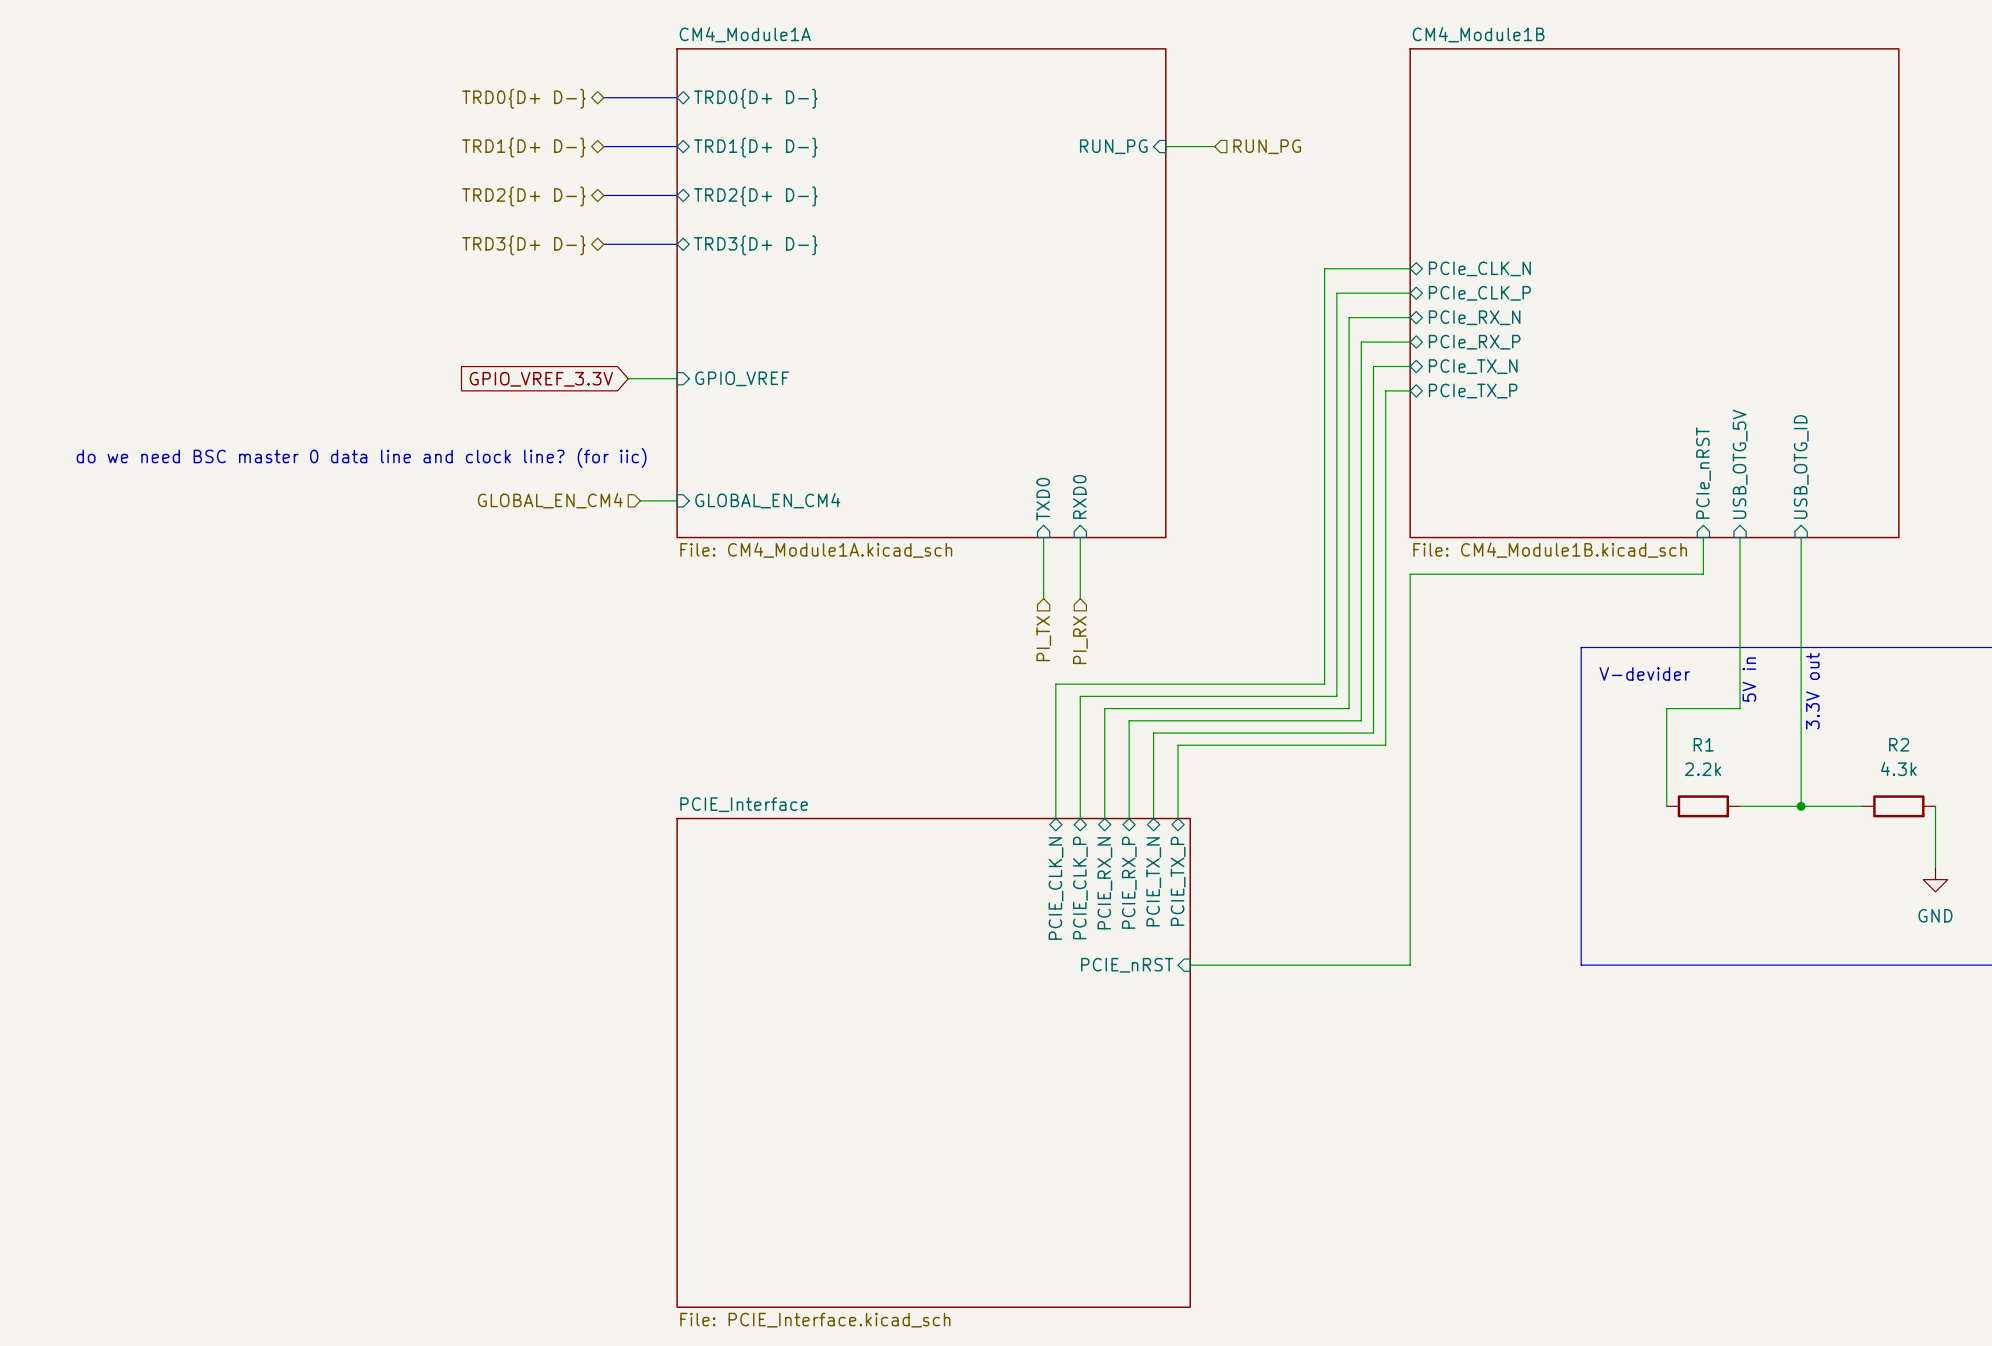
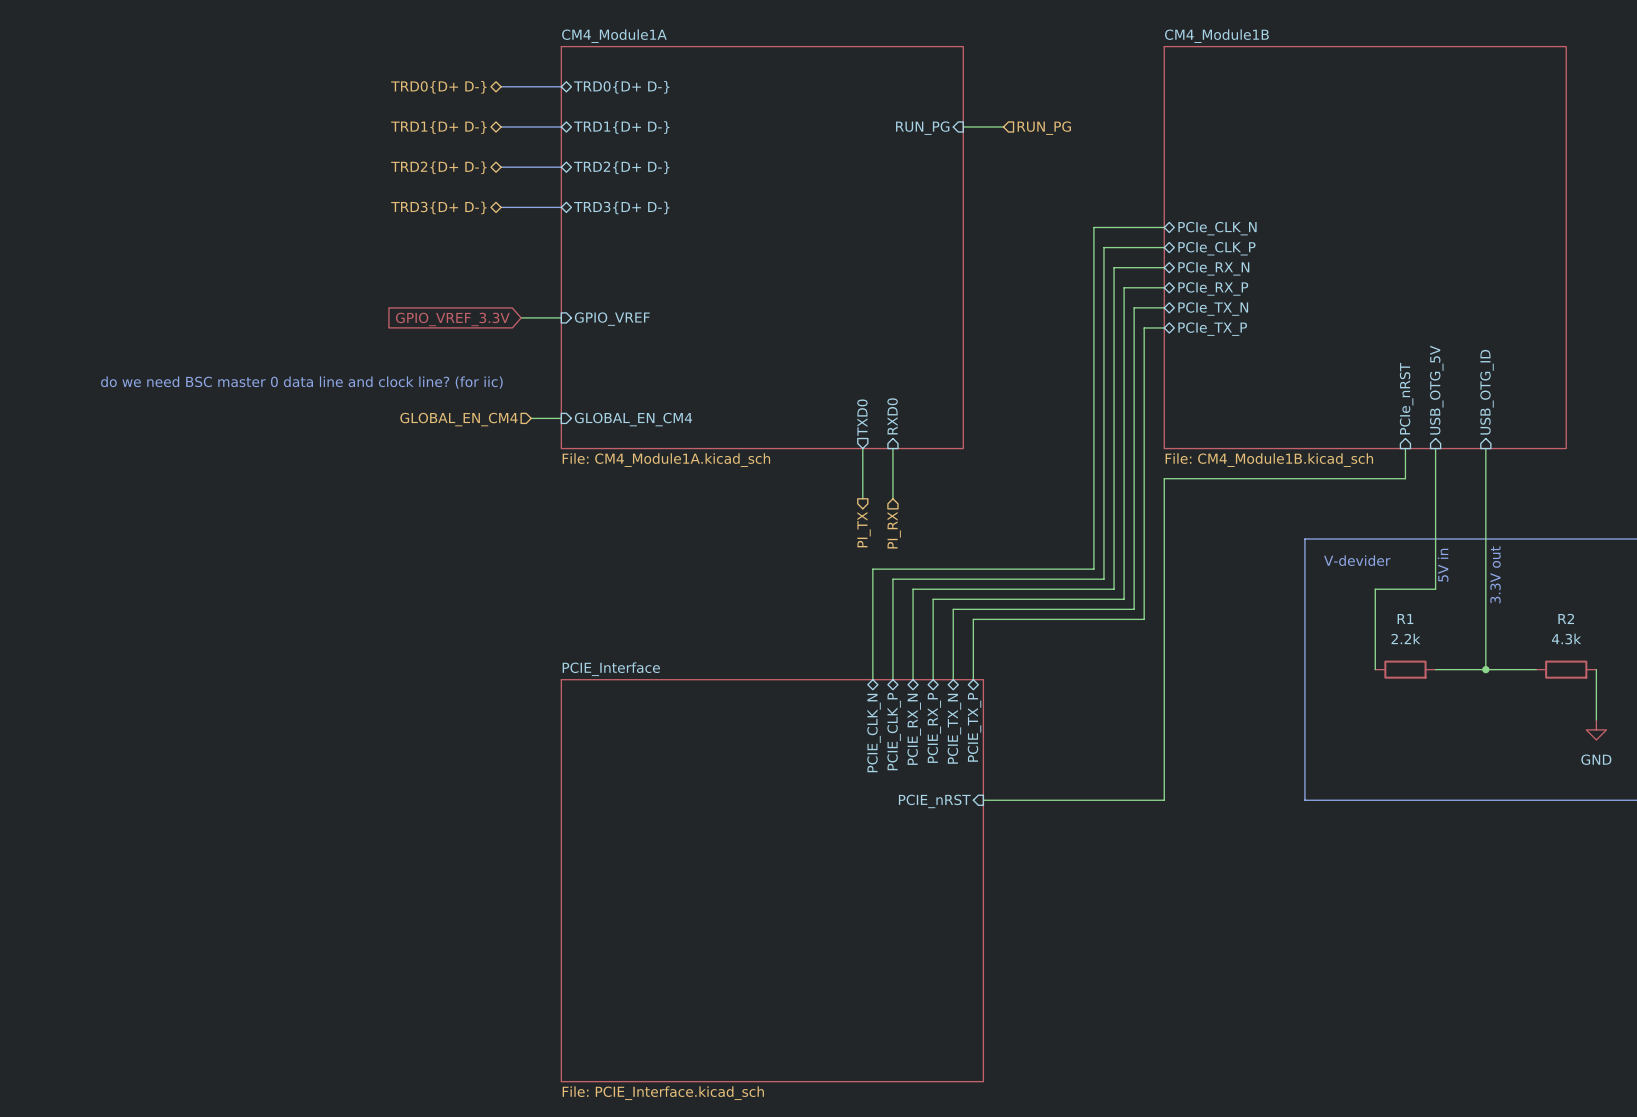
sheet pin shape: input (1043, 499) -> output (862, 417)
hierarchical label shape: input (1043, 638) -> output (864, 529)

